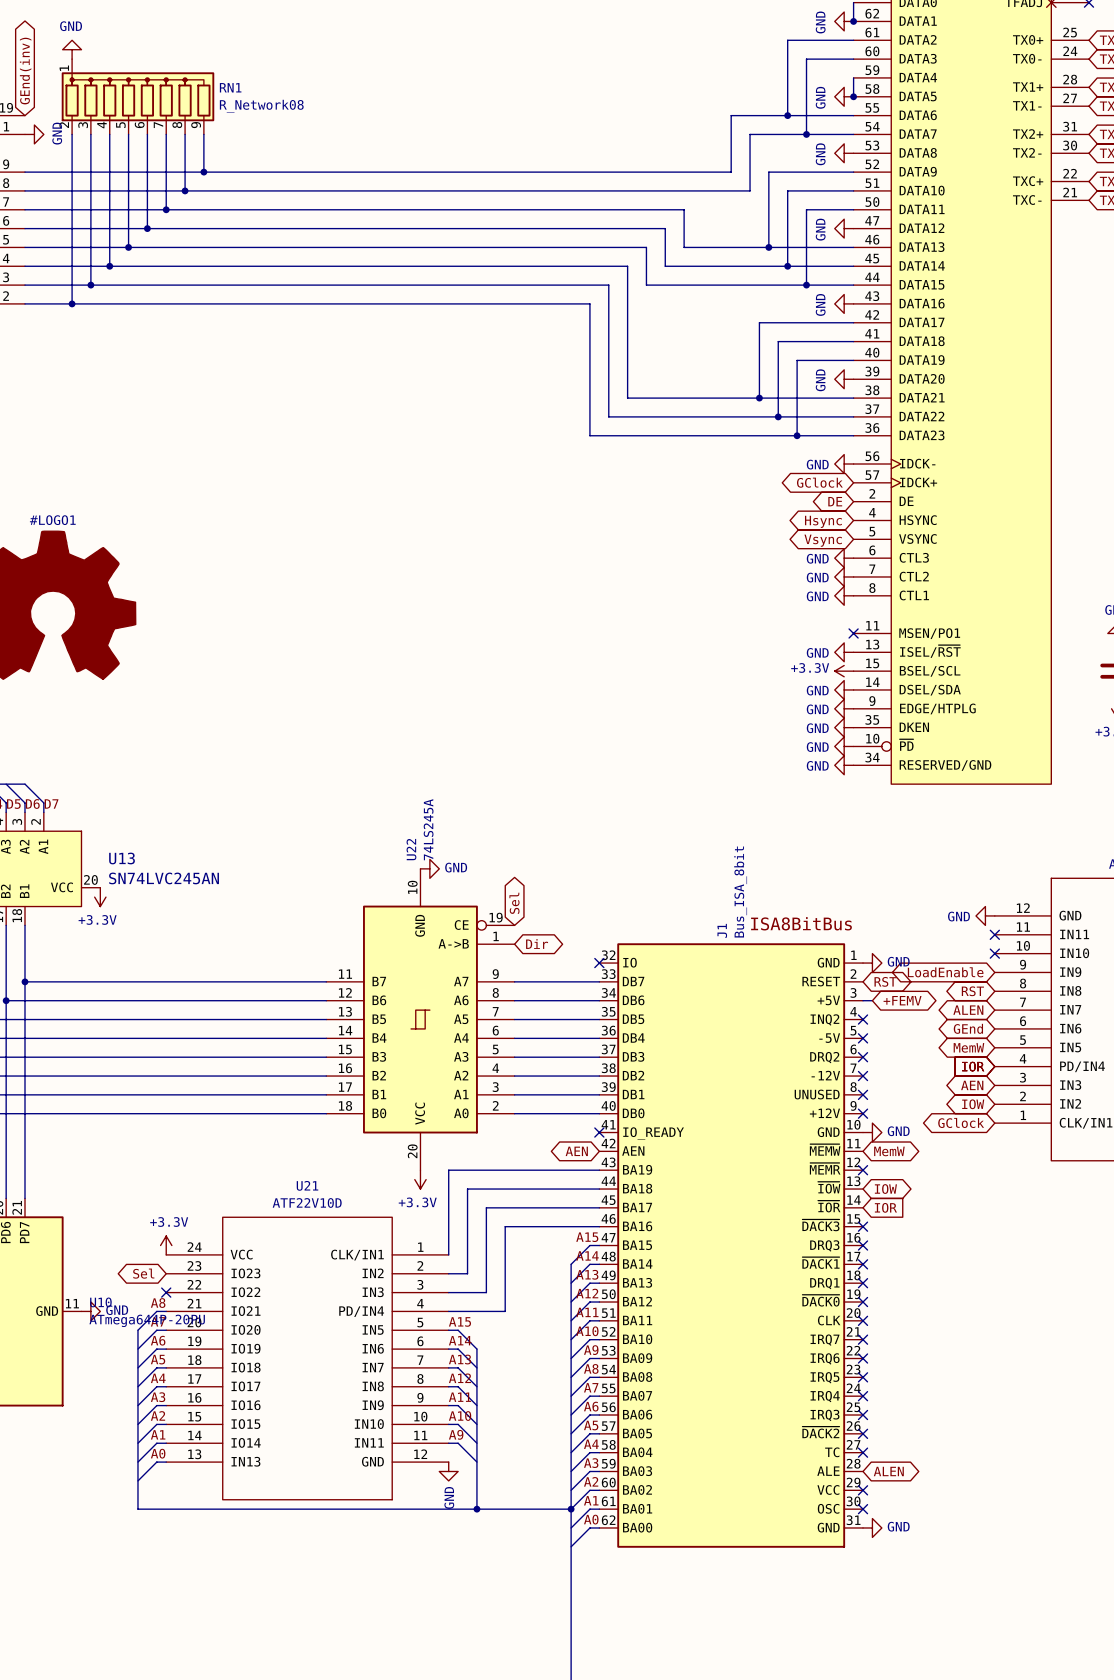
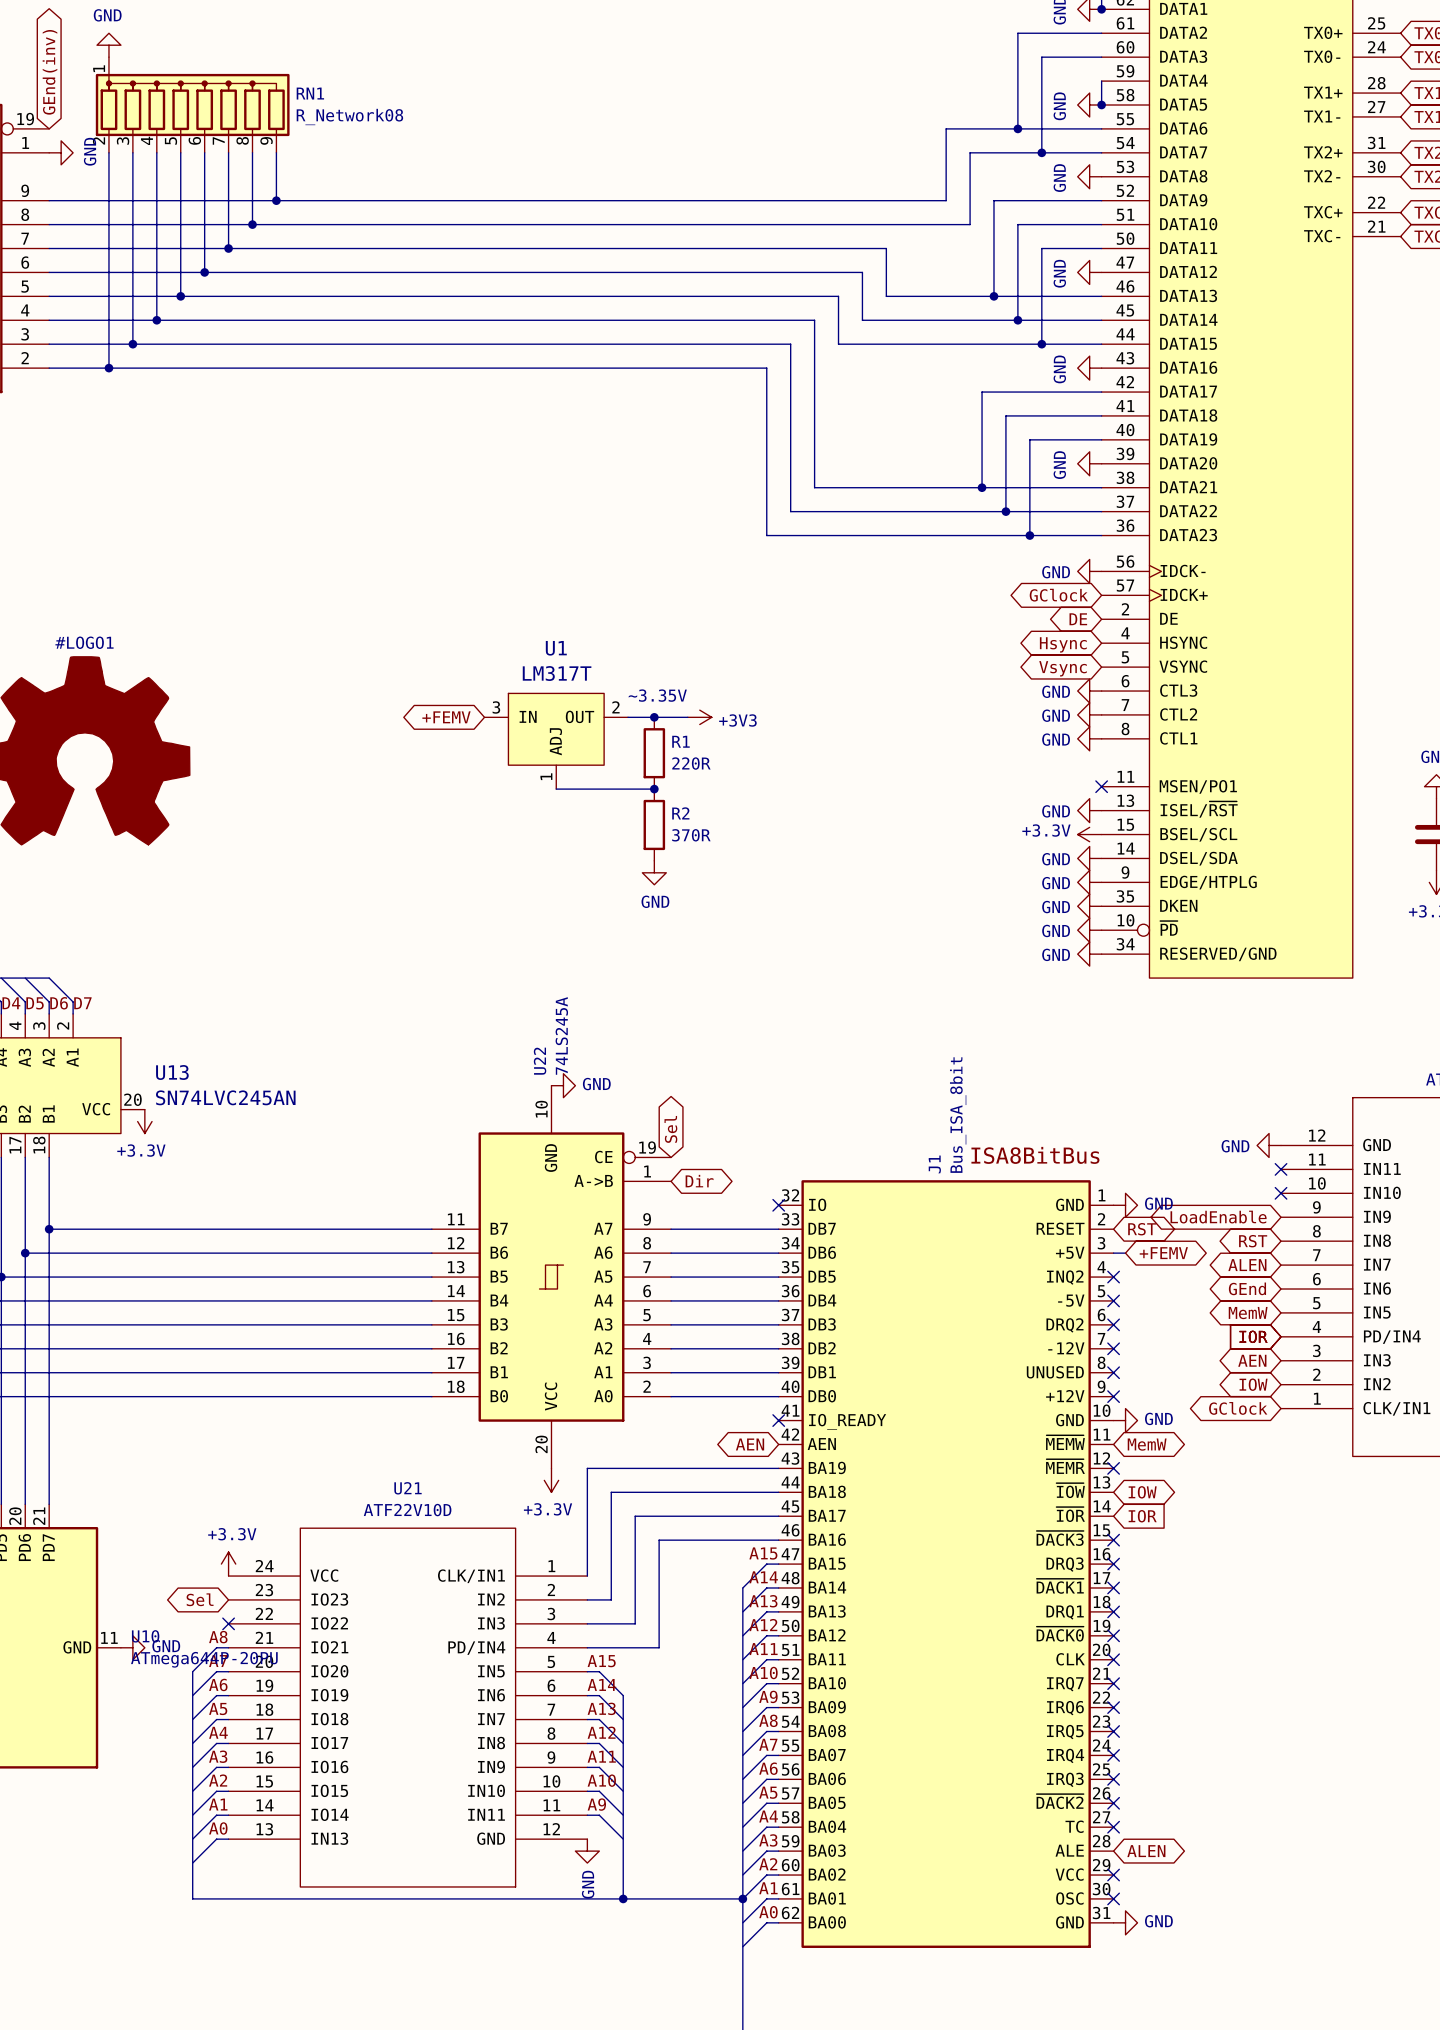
text: none -> ~3.35V (657, 695)
global label: none -> +FEMV (446, 717)
wire: none -> (628, 717) (687, 717)
junction: none -> (654, 717)
power symbol: none -> +3V3 (699, 717)
U1: none -> LM317T (556, 741)
R1: none -> 220R (654, 753)
wire: none -> (556, 789) (654, 789)
junction: none -> (654, 789)
R2: none -> 370R (654, 824)
power symbol: none -> GND (654, 872)

